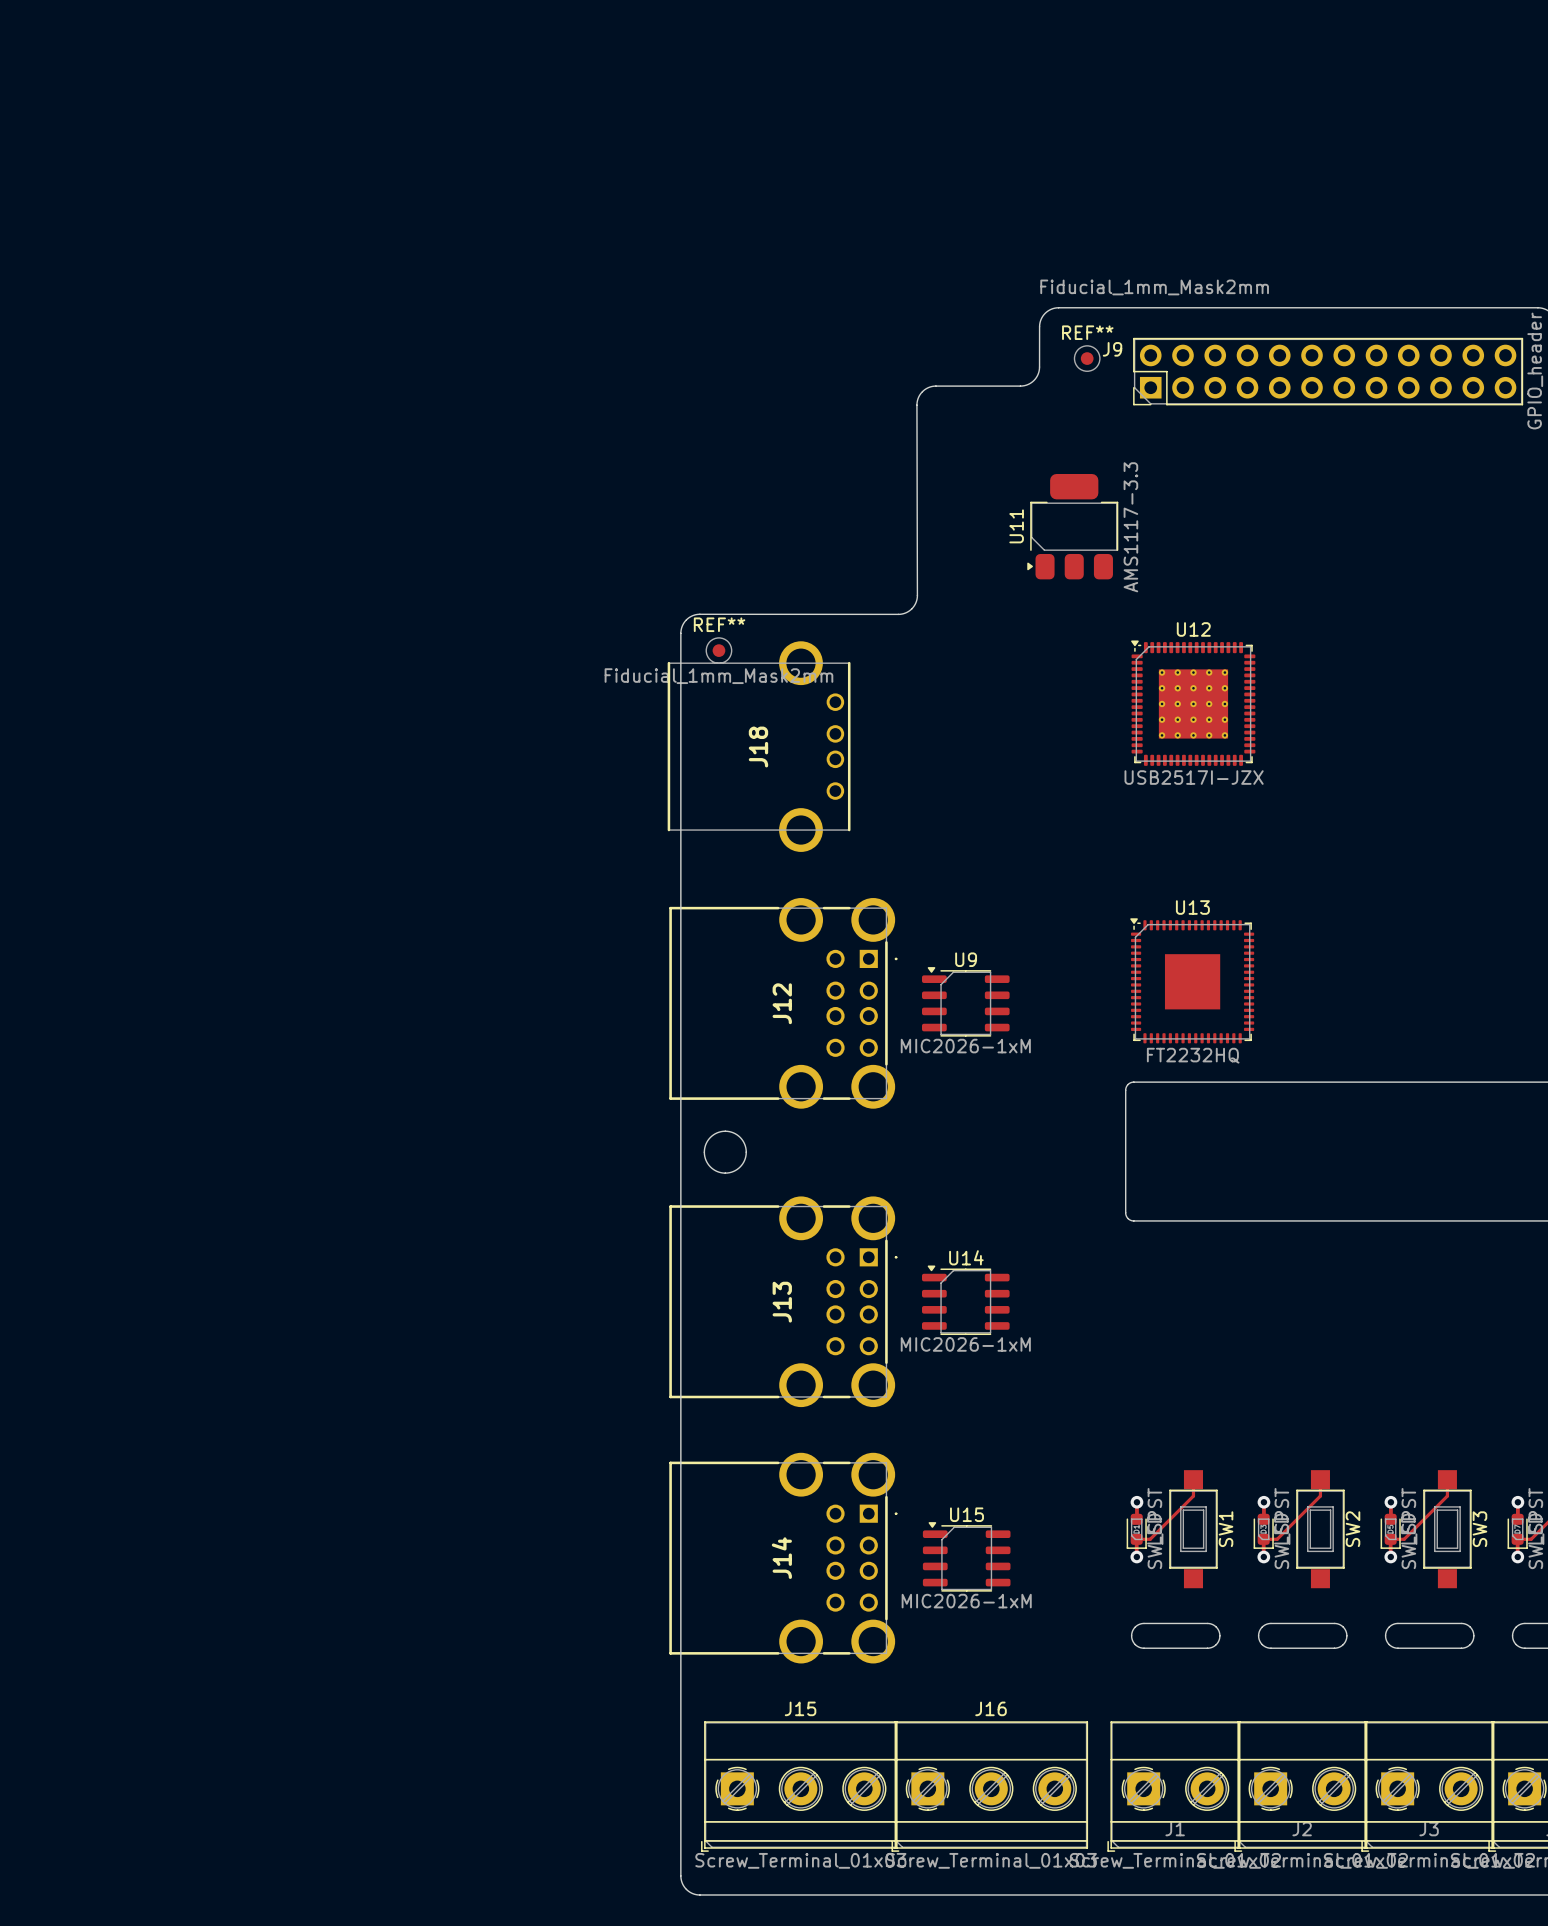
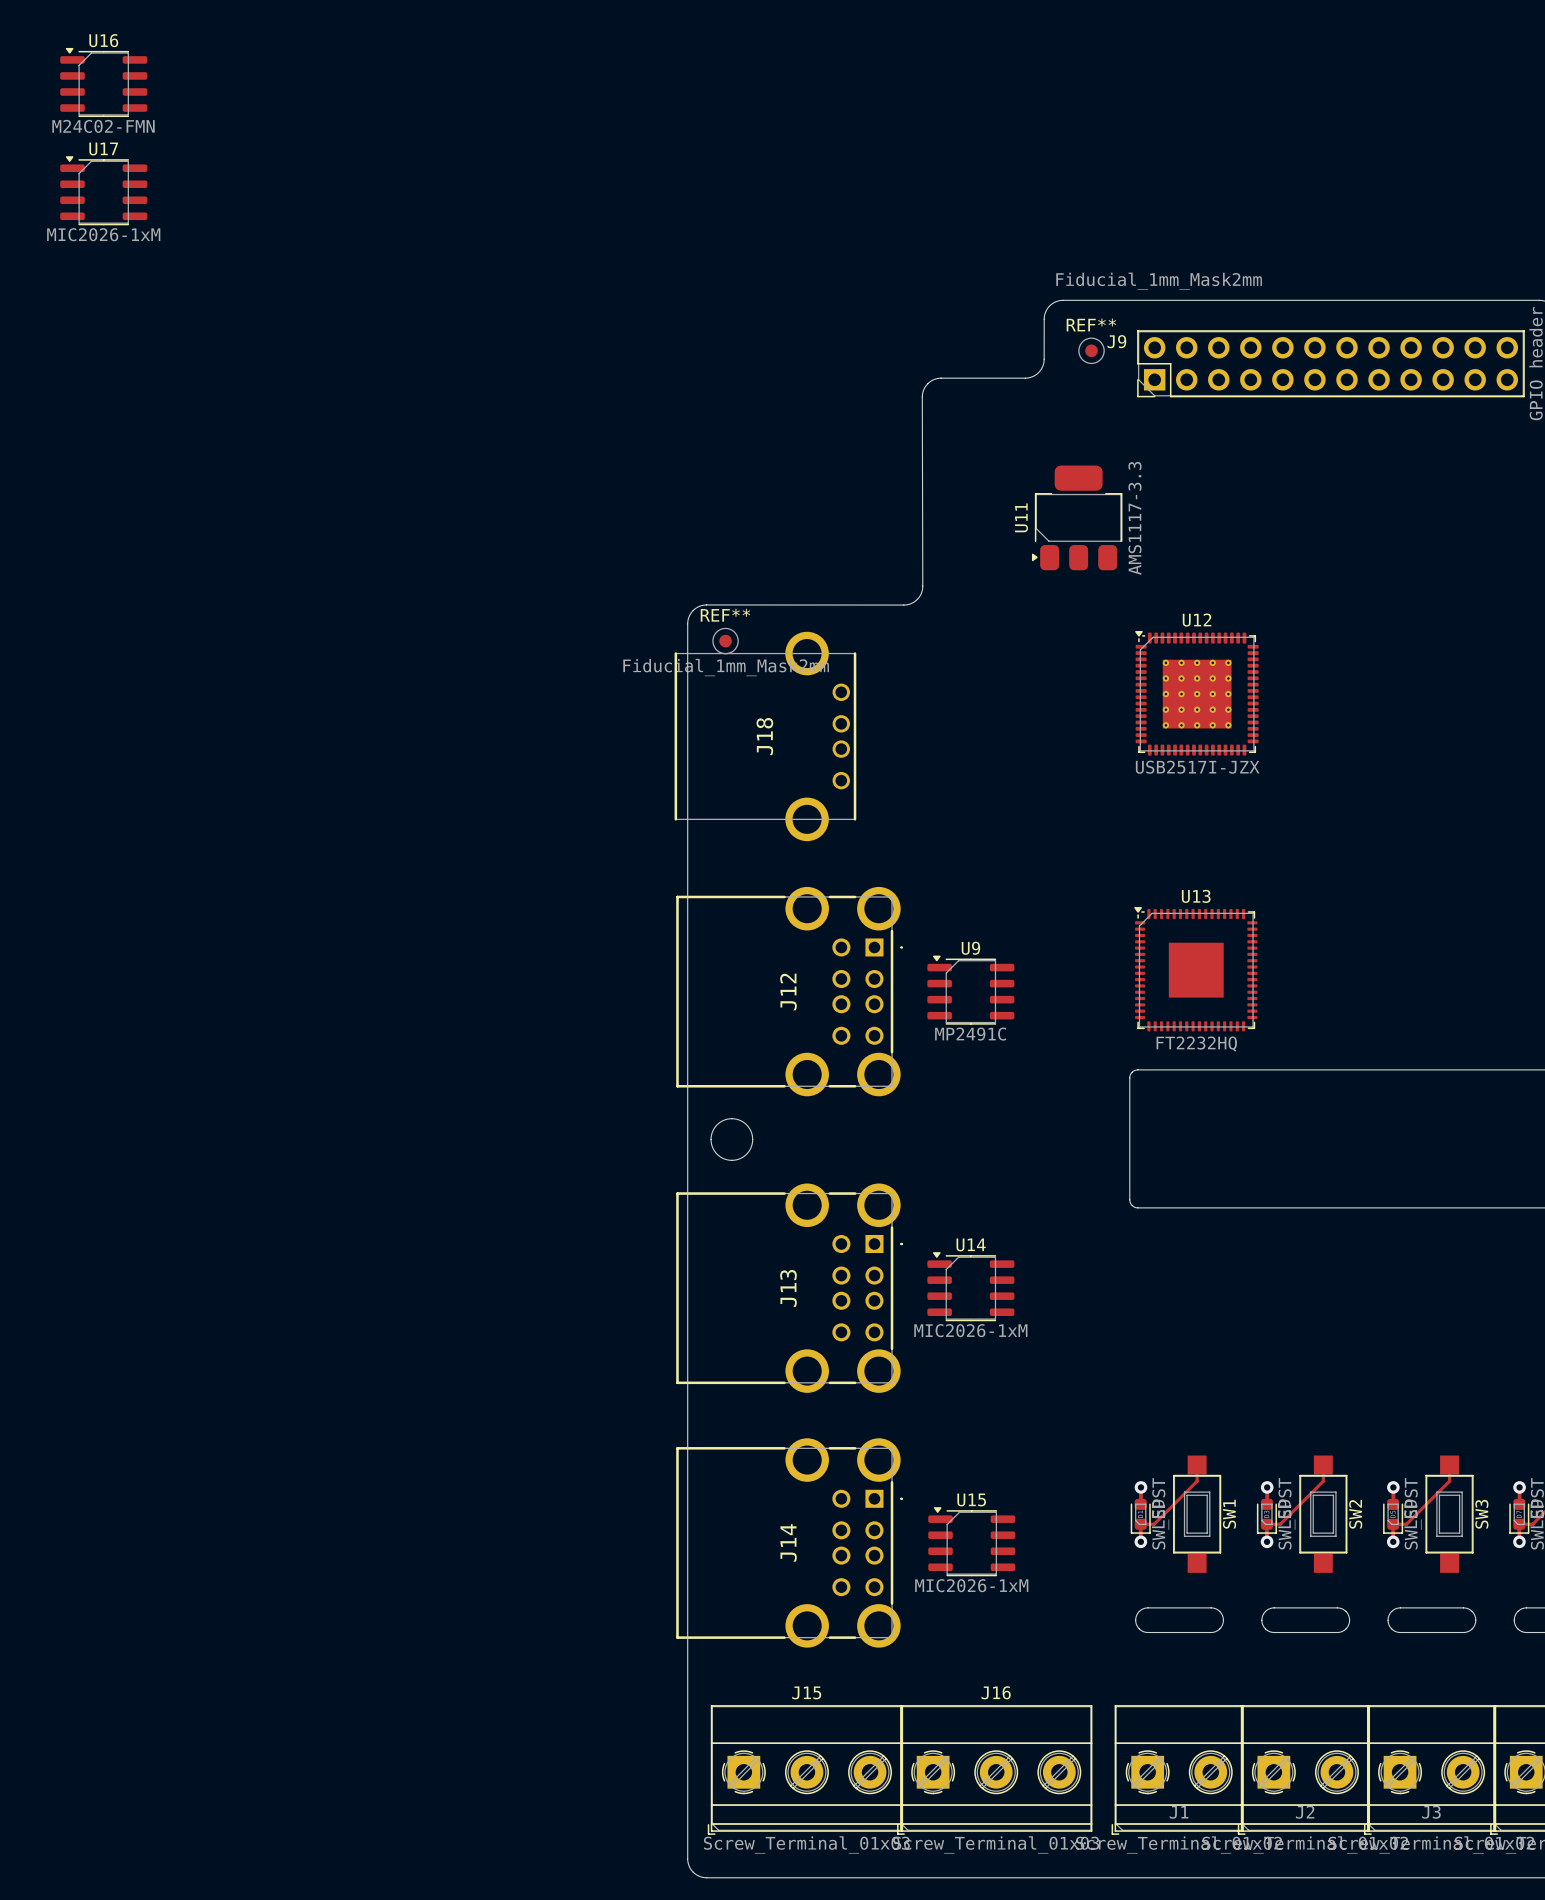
U16: none -> M24C02-FMN (103, 82)
U17: none -> MIC2026-1xM (103, 190)
U9 value: MIC2026-1xM (965, 1046) -> MP2491C (970, 1034)

